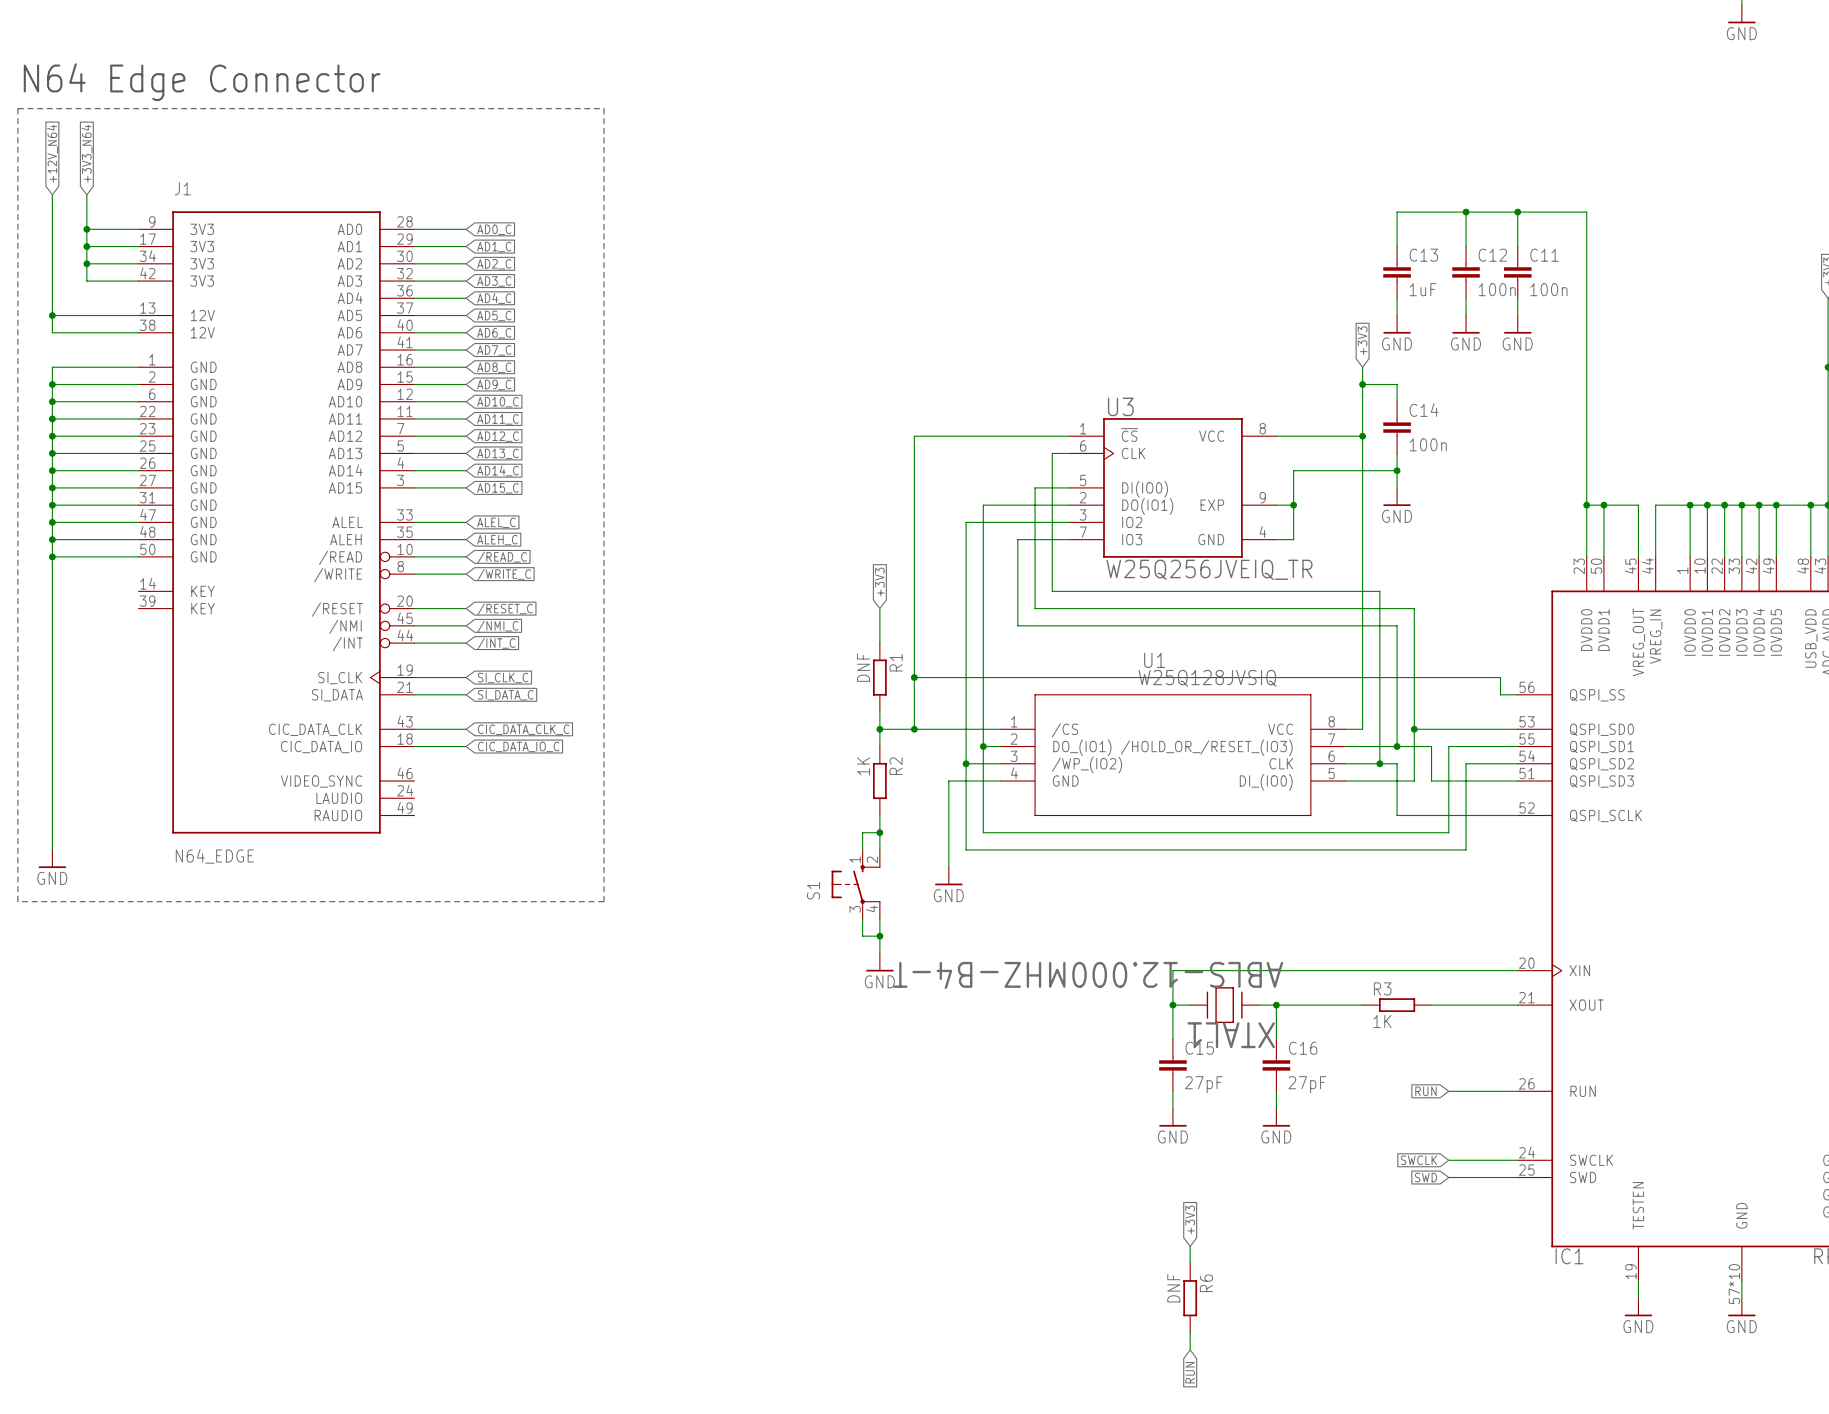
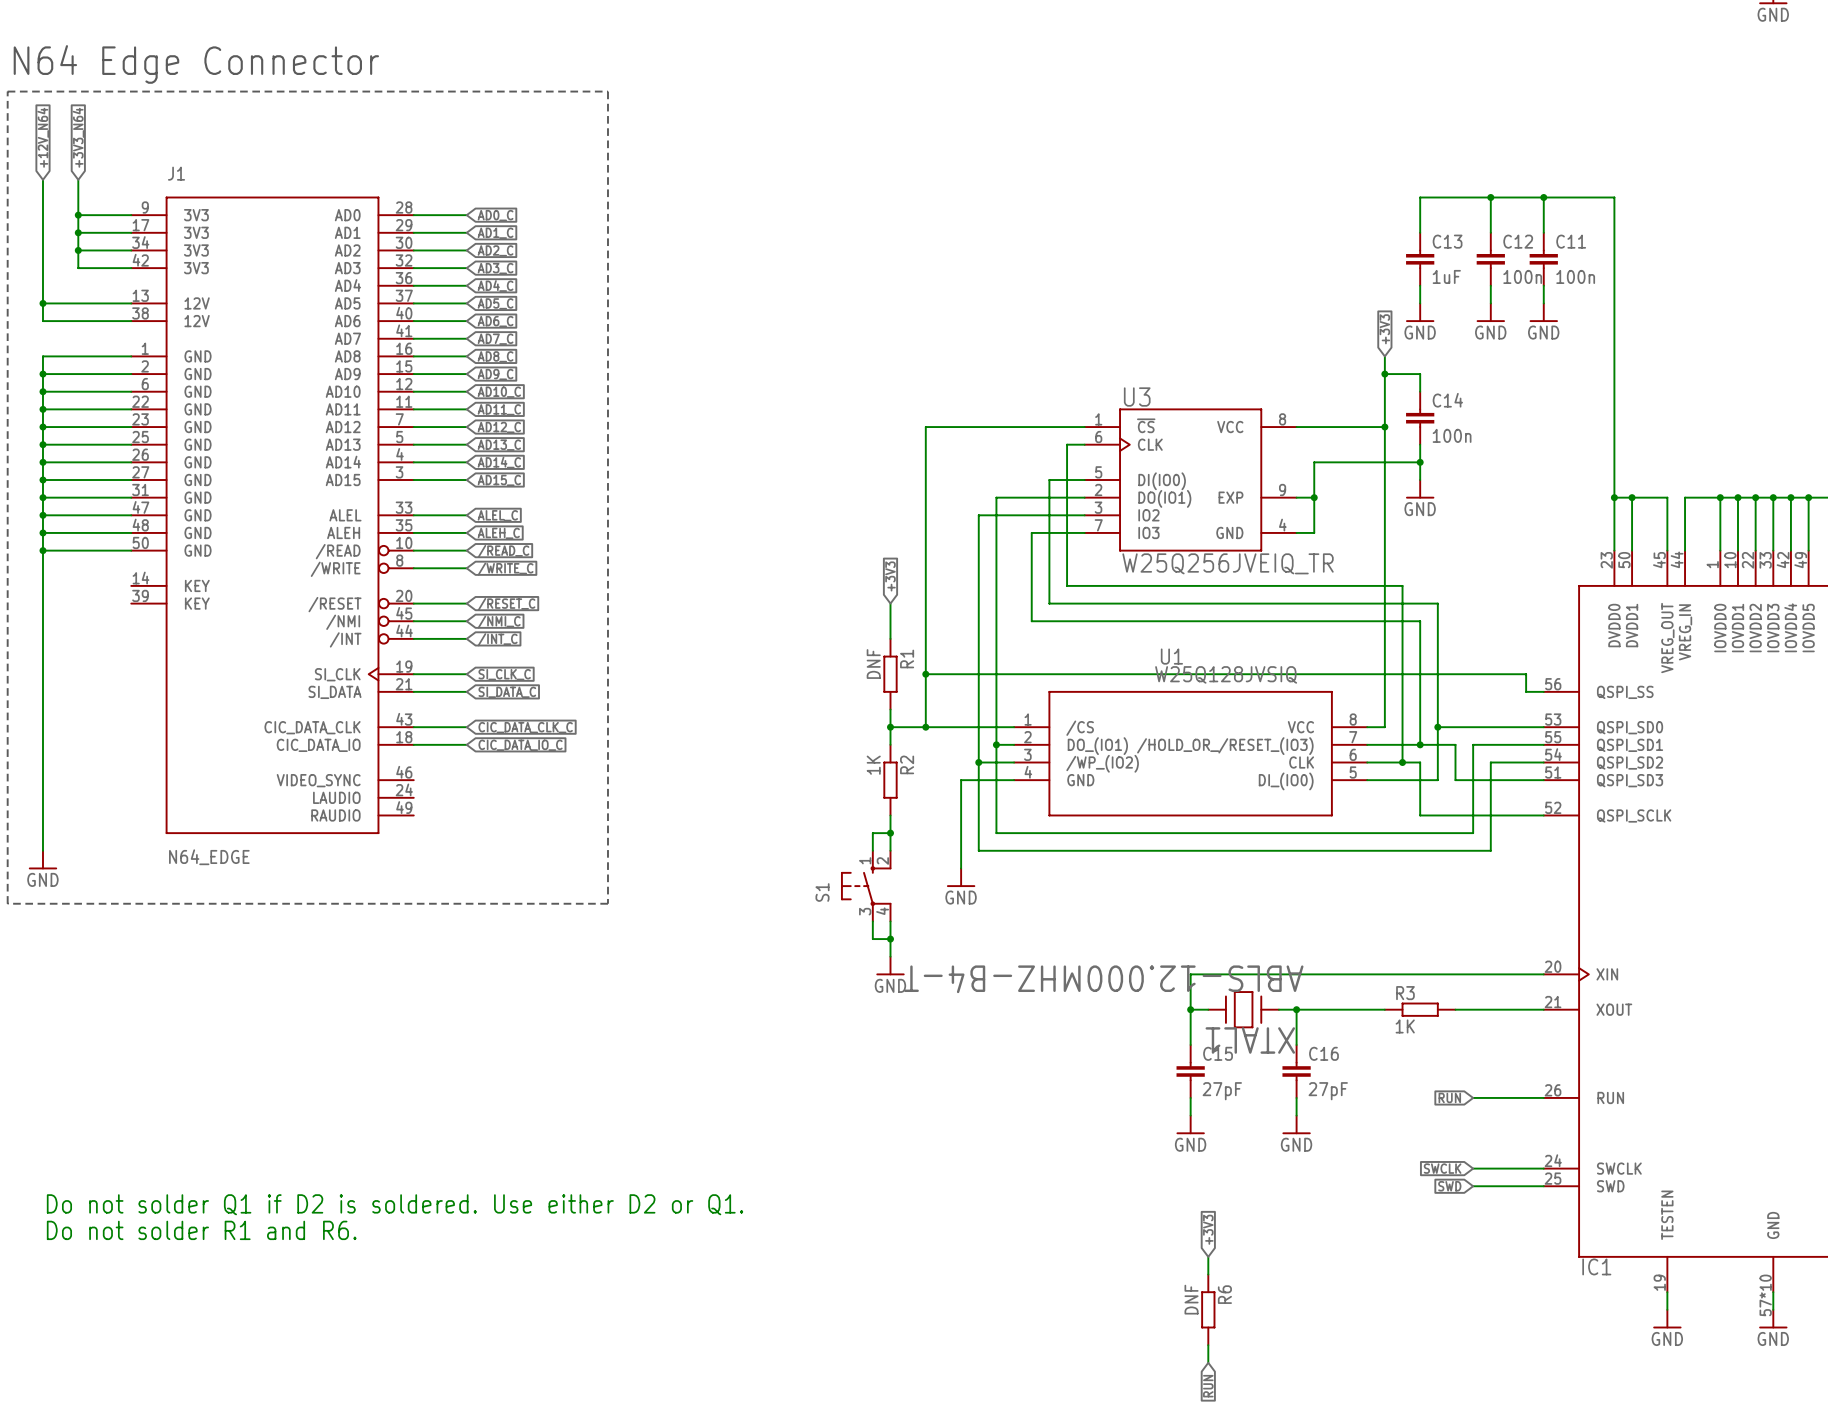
text: none -> Do not solder Q1 if D2 is soldered. Use either D2 or Q1. (395, 1204)
text: none -> Do not solder R1 and R6. (201, 1230)

